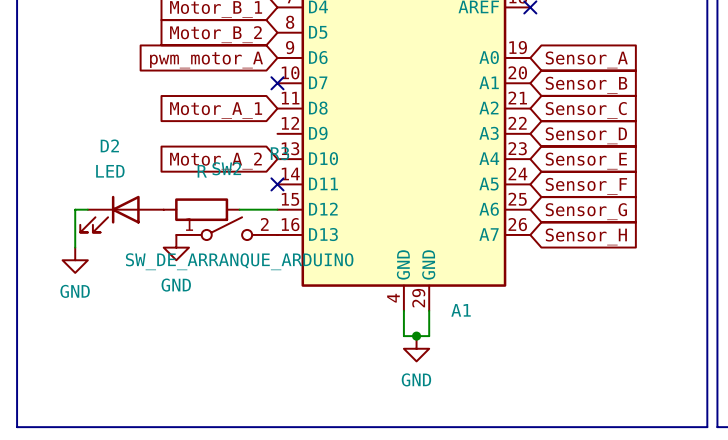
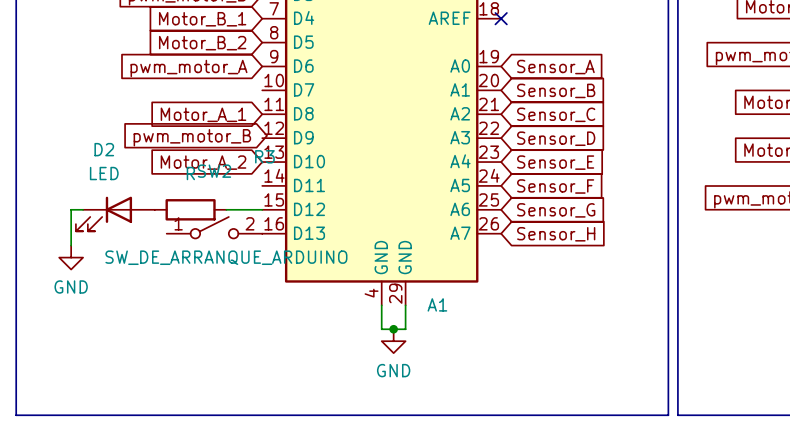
no-connect mark: (277, 83) -> none
global label: none -> pwm_motor_B (192, 137)
no-connect mark: (277, 184) -> none
power symbol: GND (176, 247) -> none

